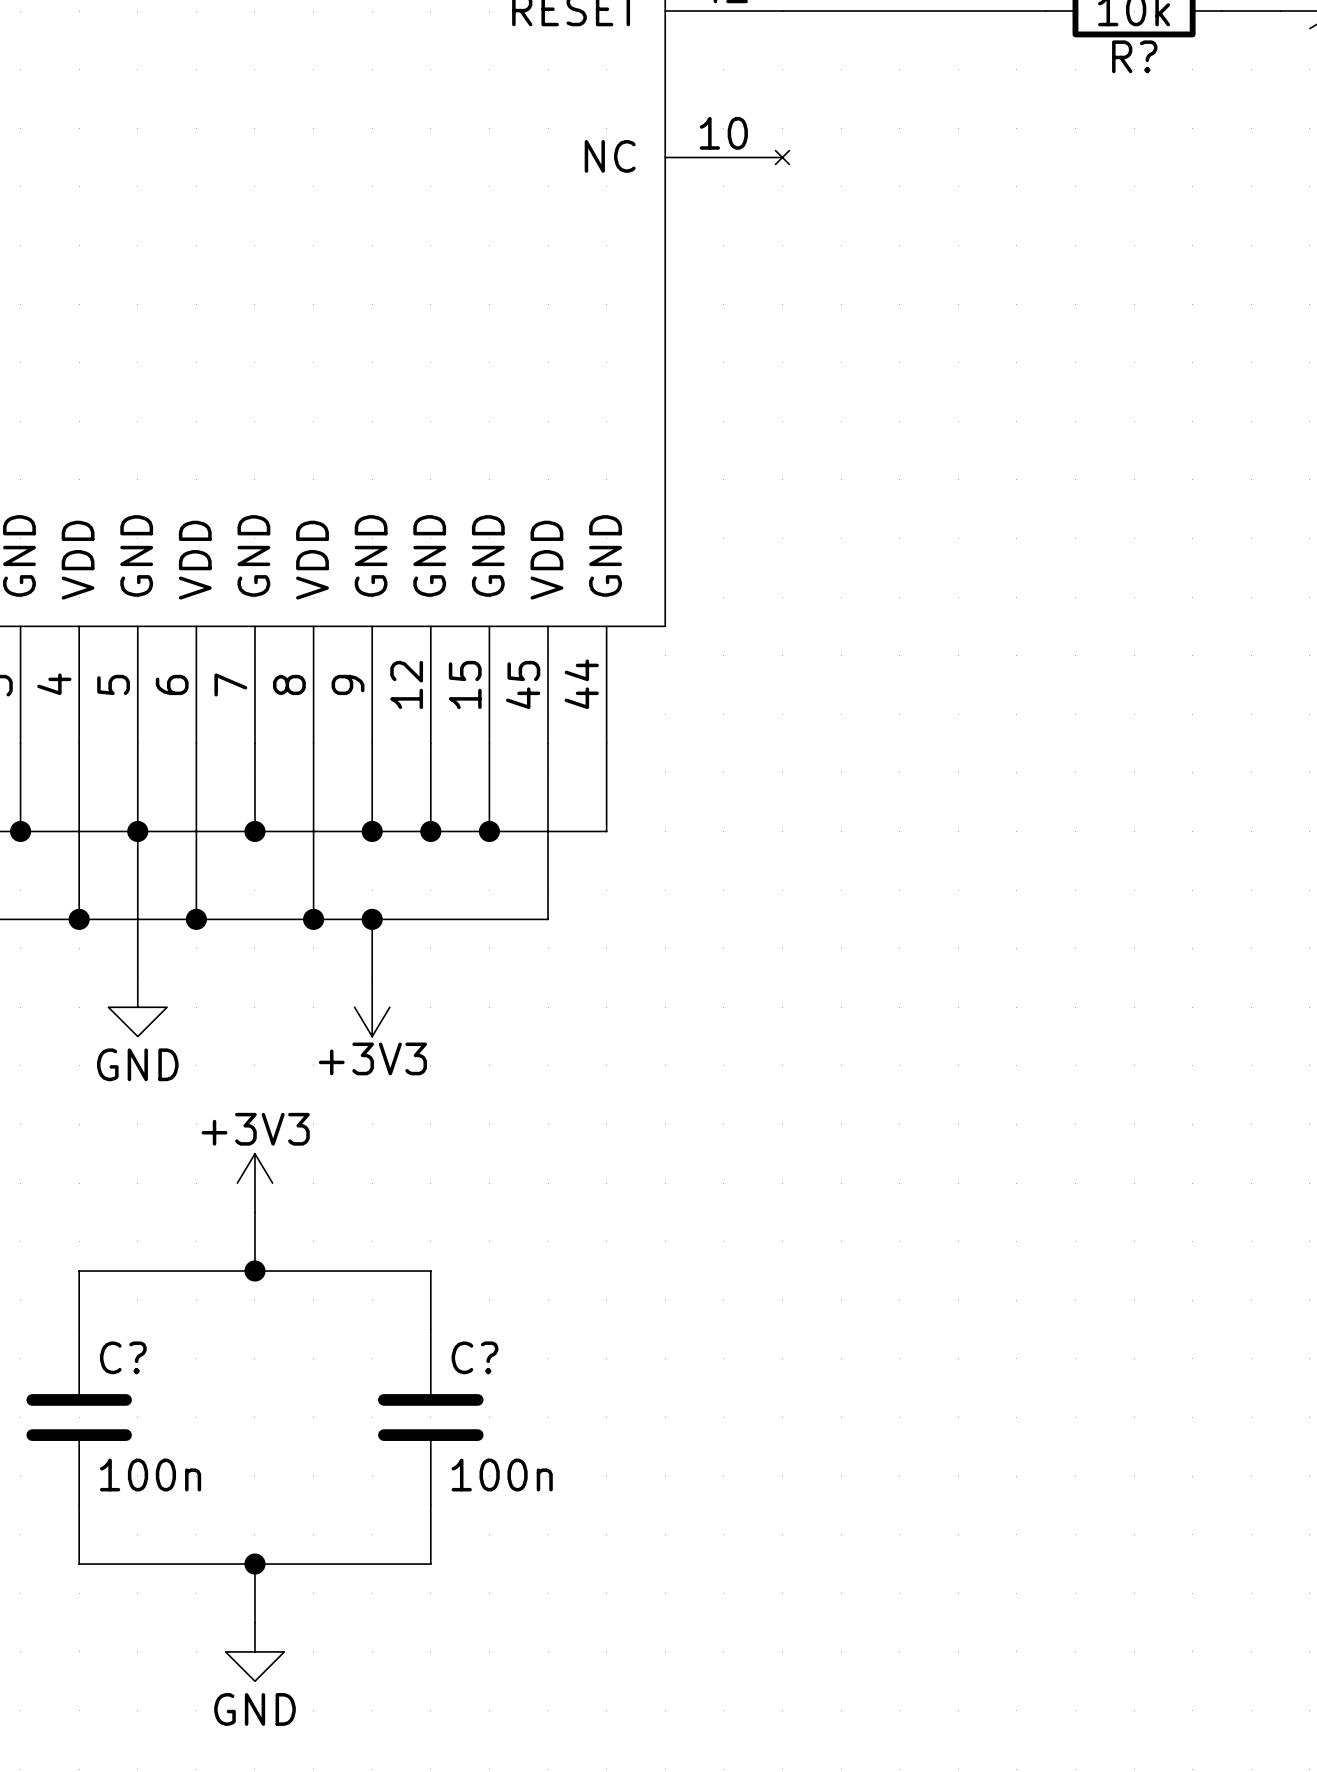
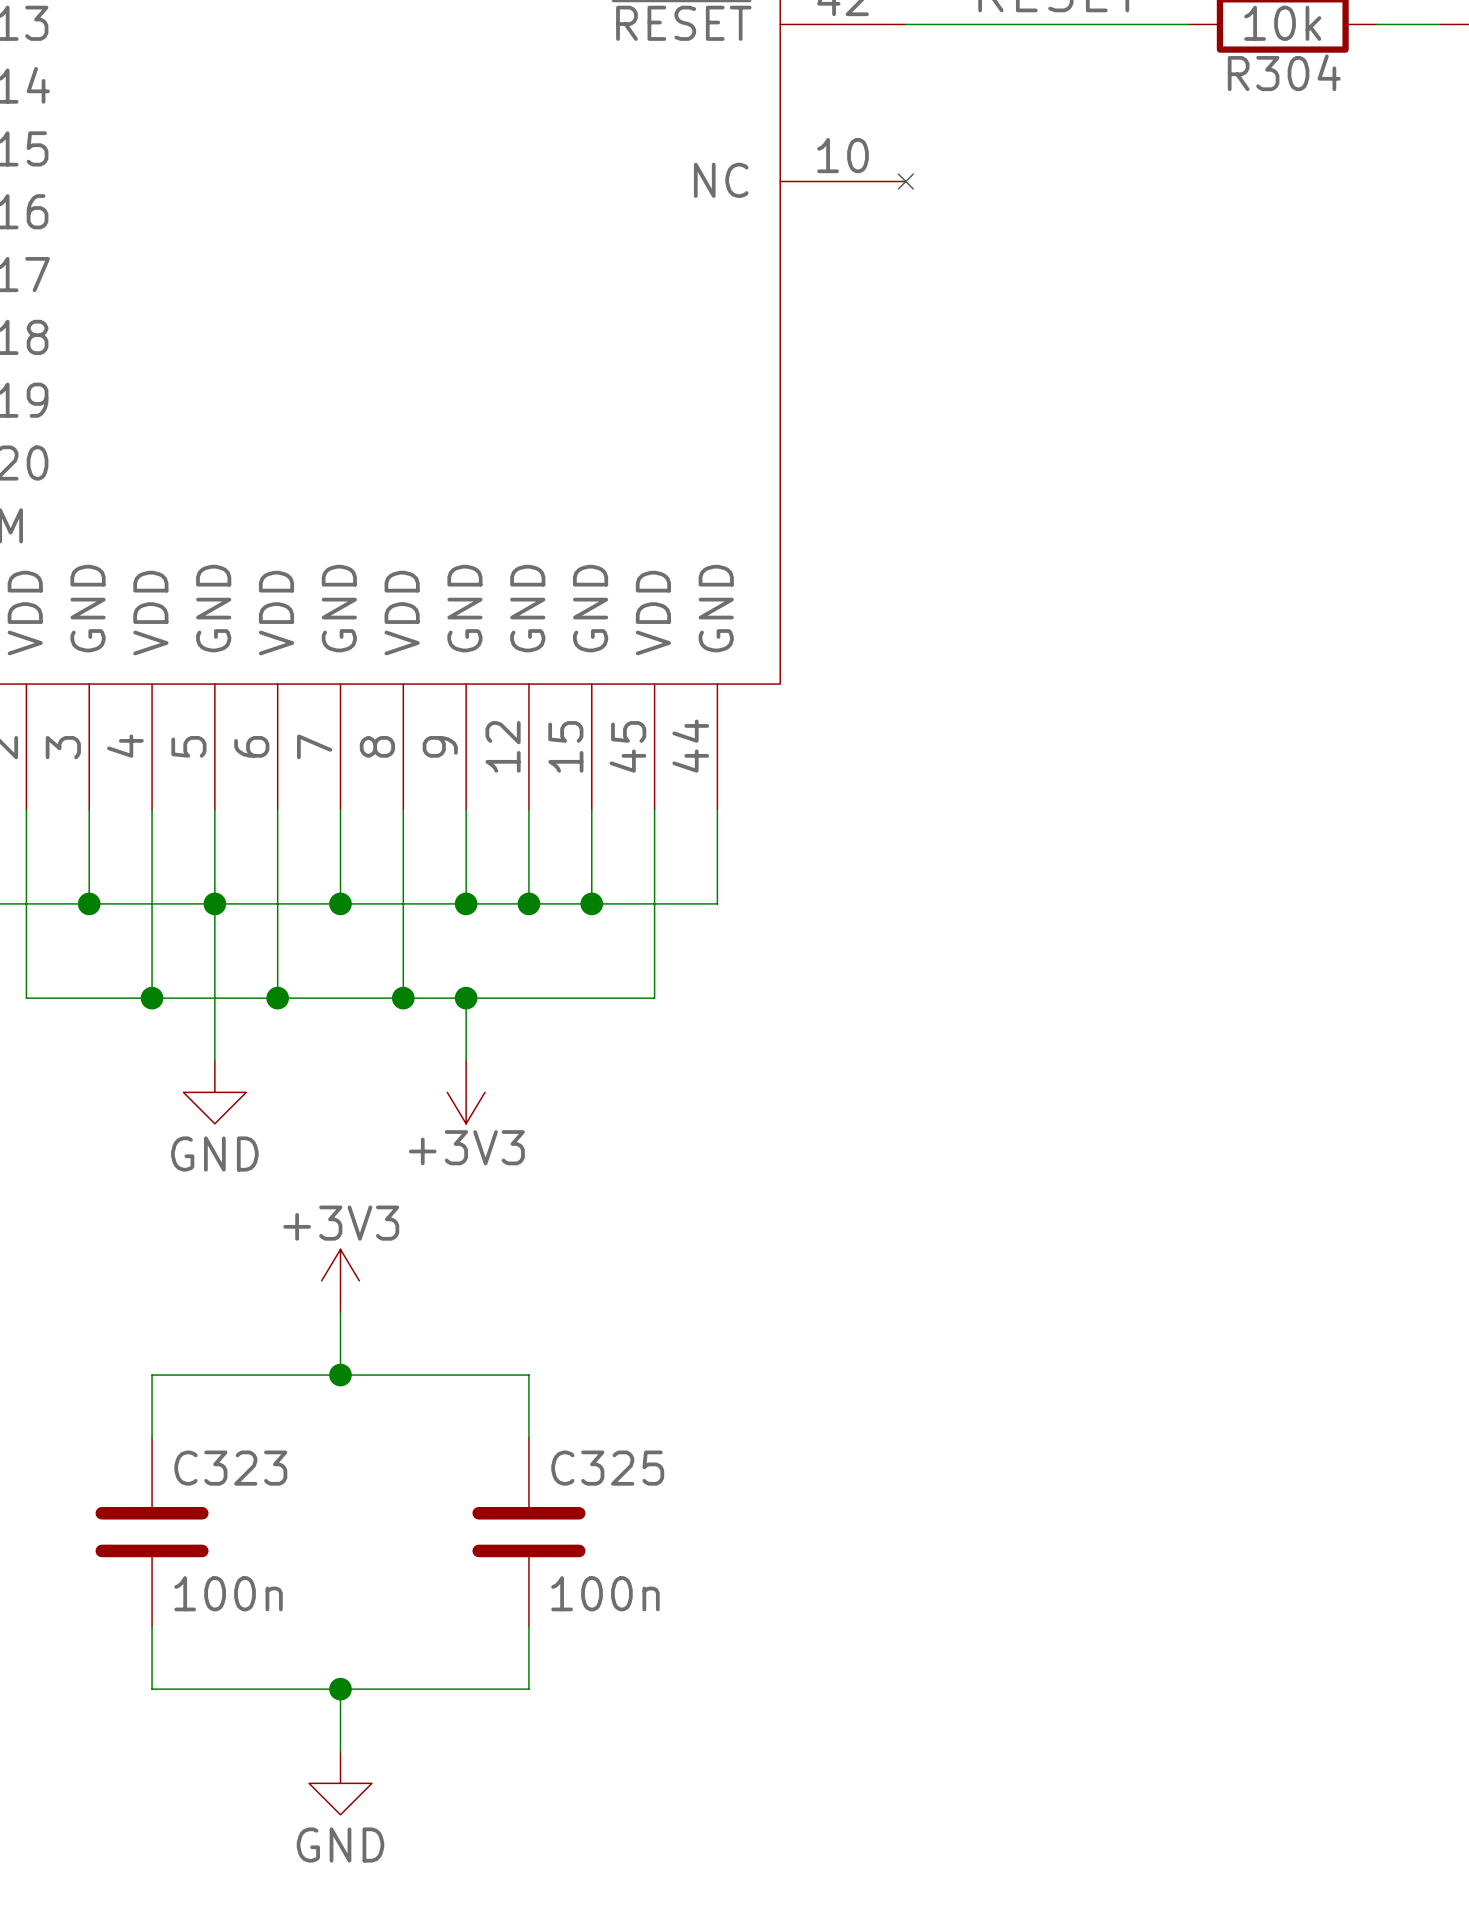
R? name: R? (1134, 56) -> R304 (1284, 72)
C? name: C? (123, 1357) -> C323 (230, 1468)
C? name: C? (474, 1357) -> C325 (607, 1468)

